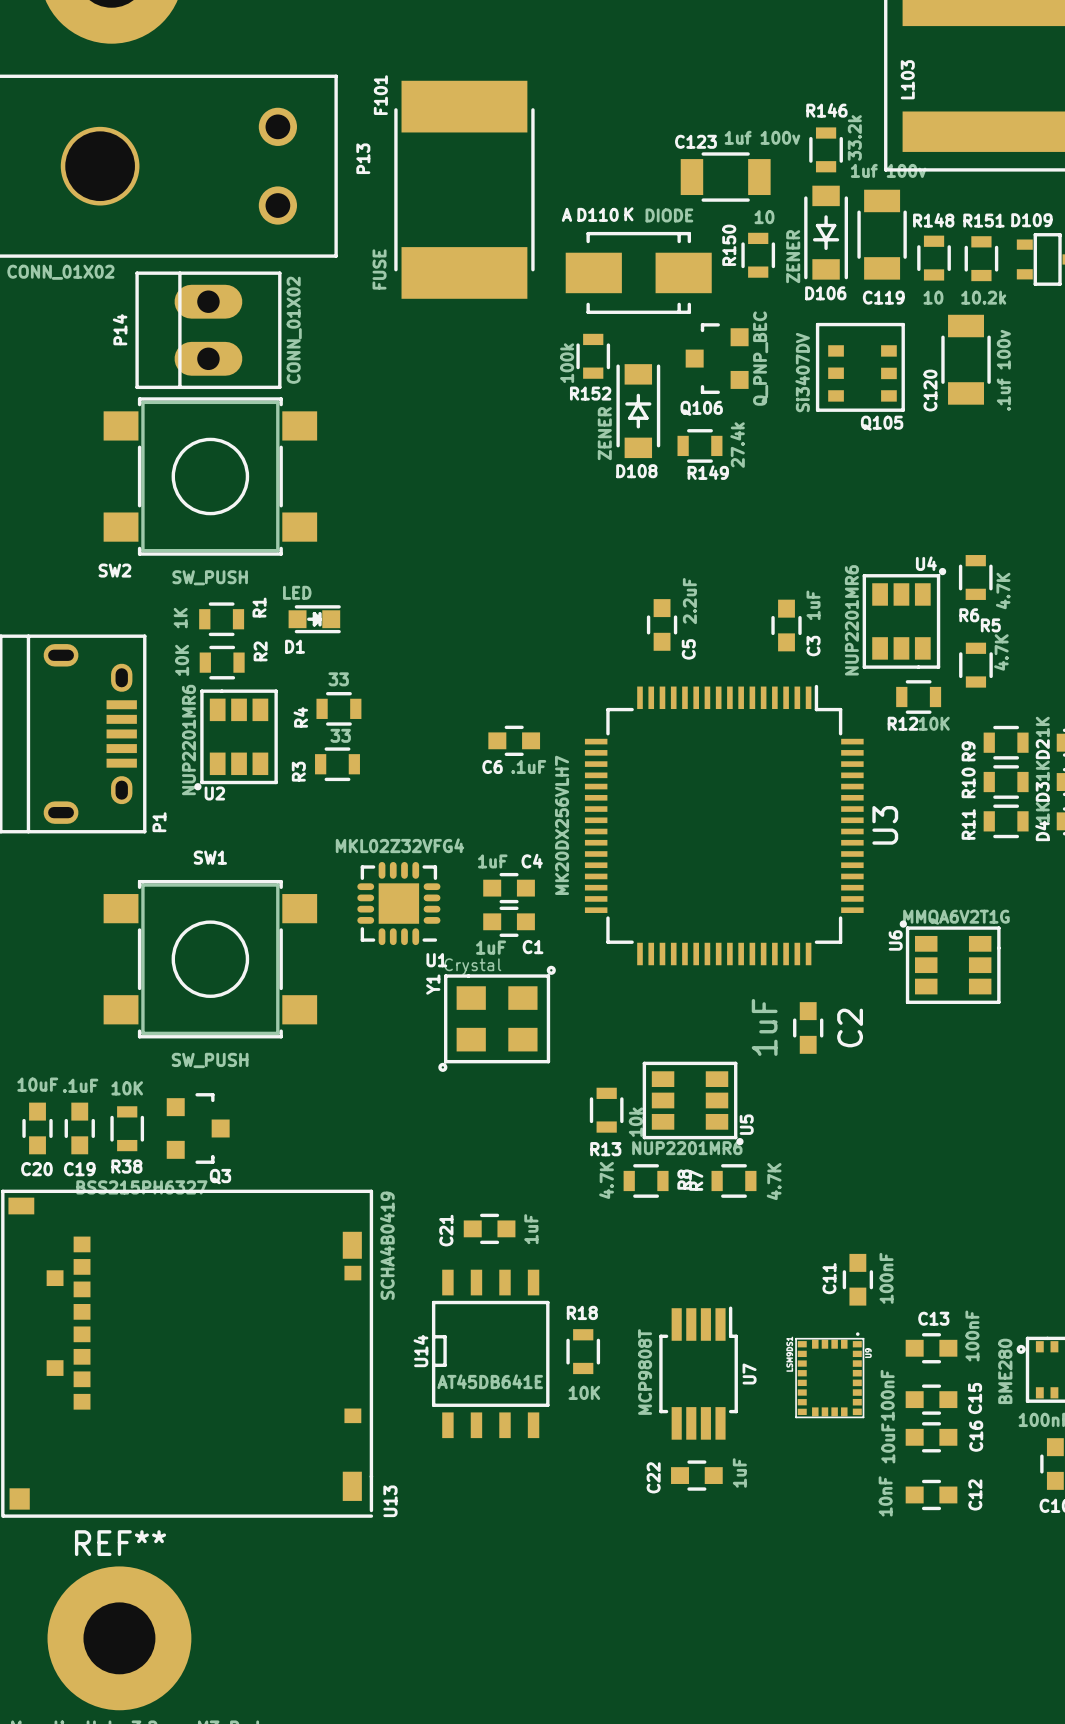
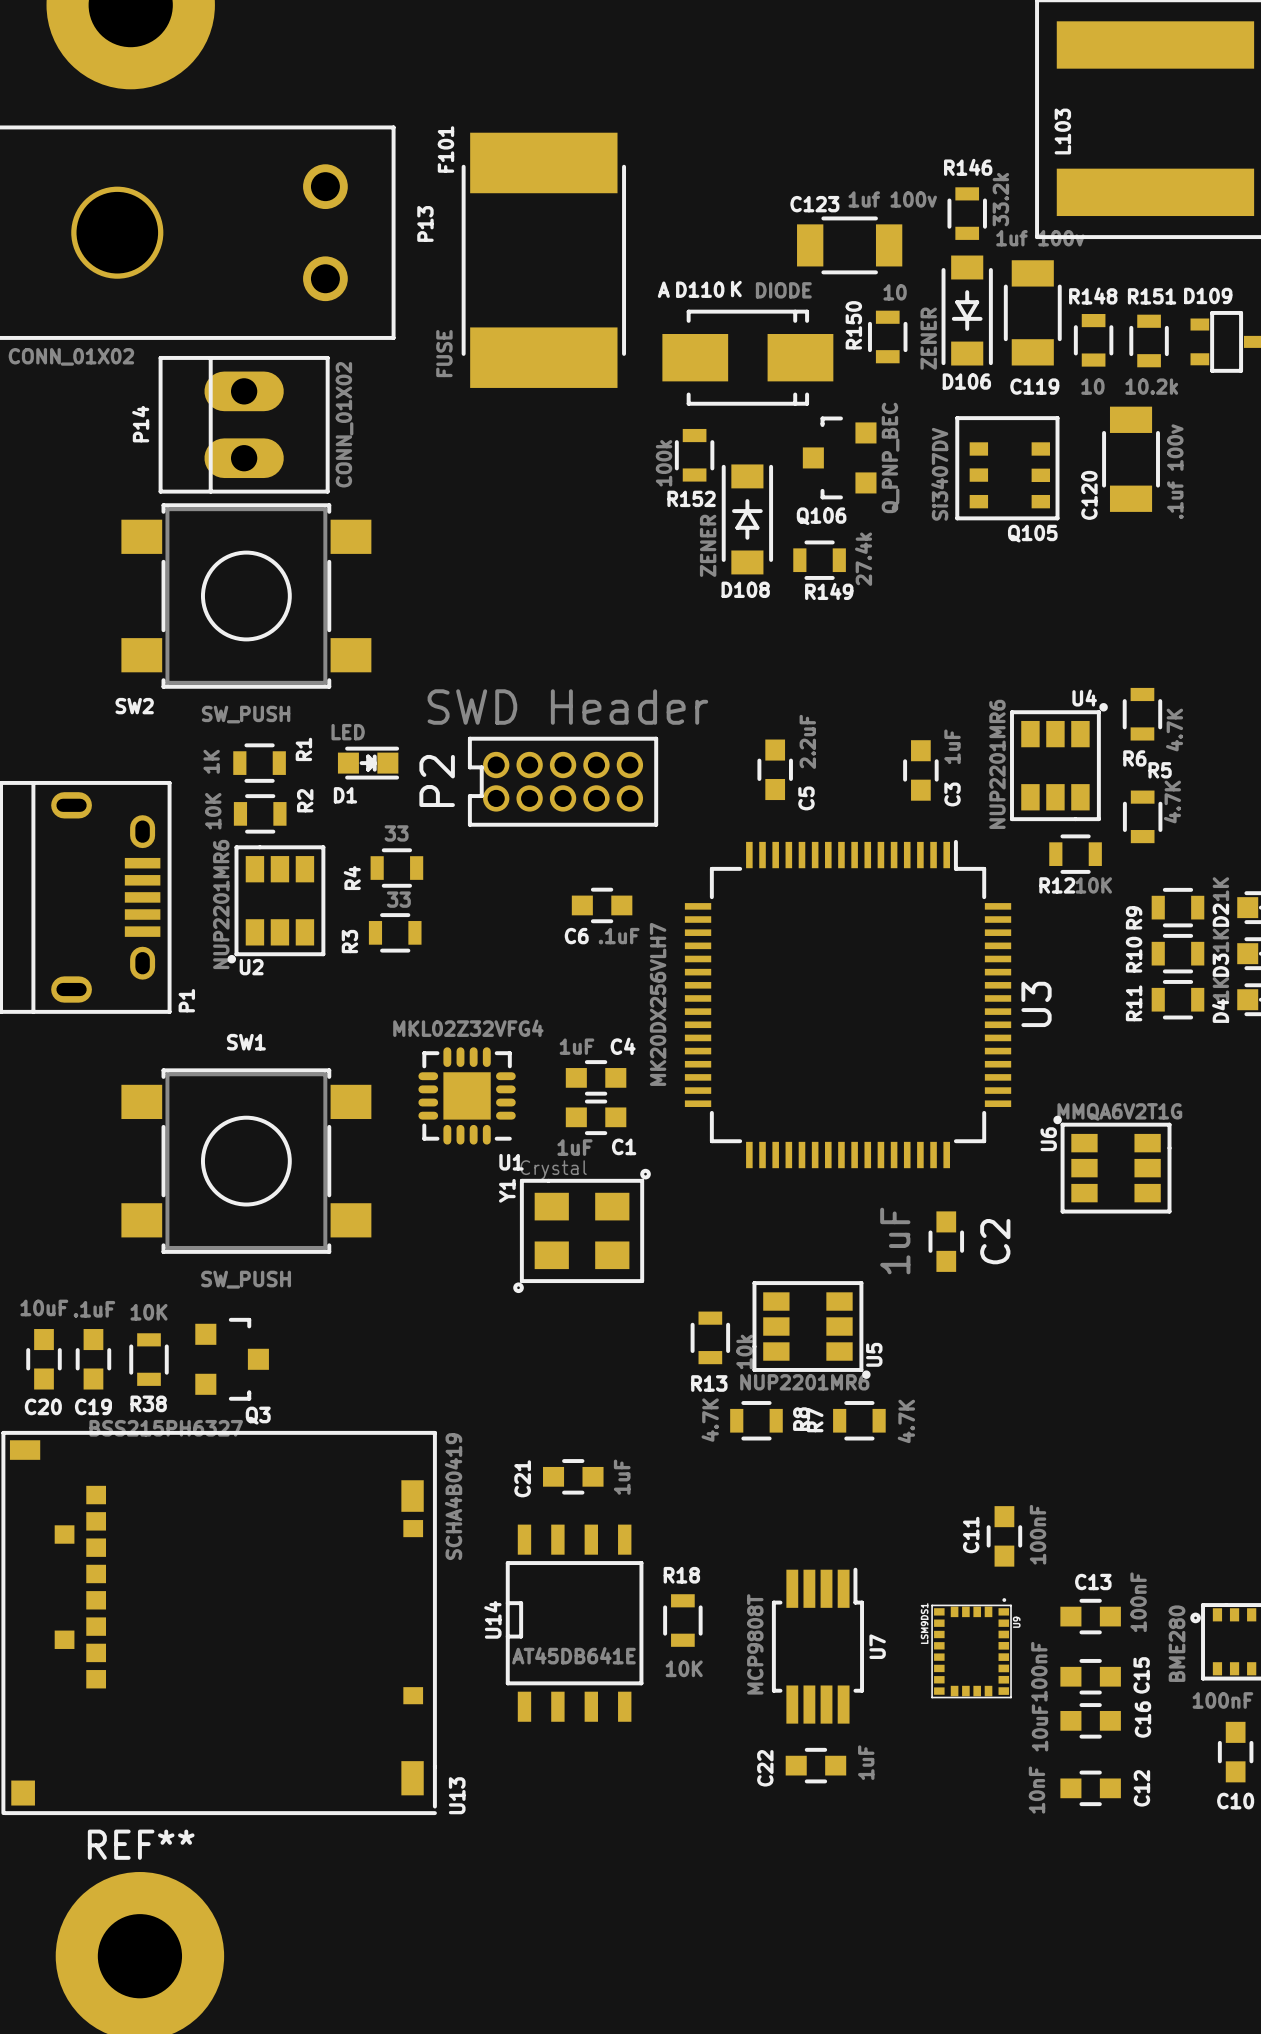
P2: none -> SWD Header (563, 781)

